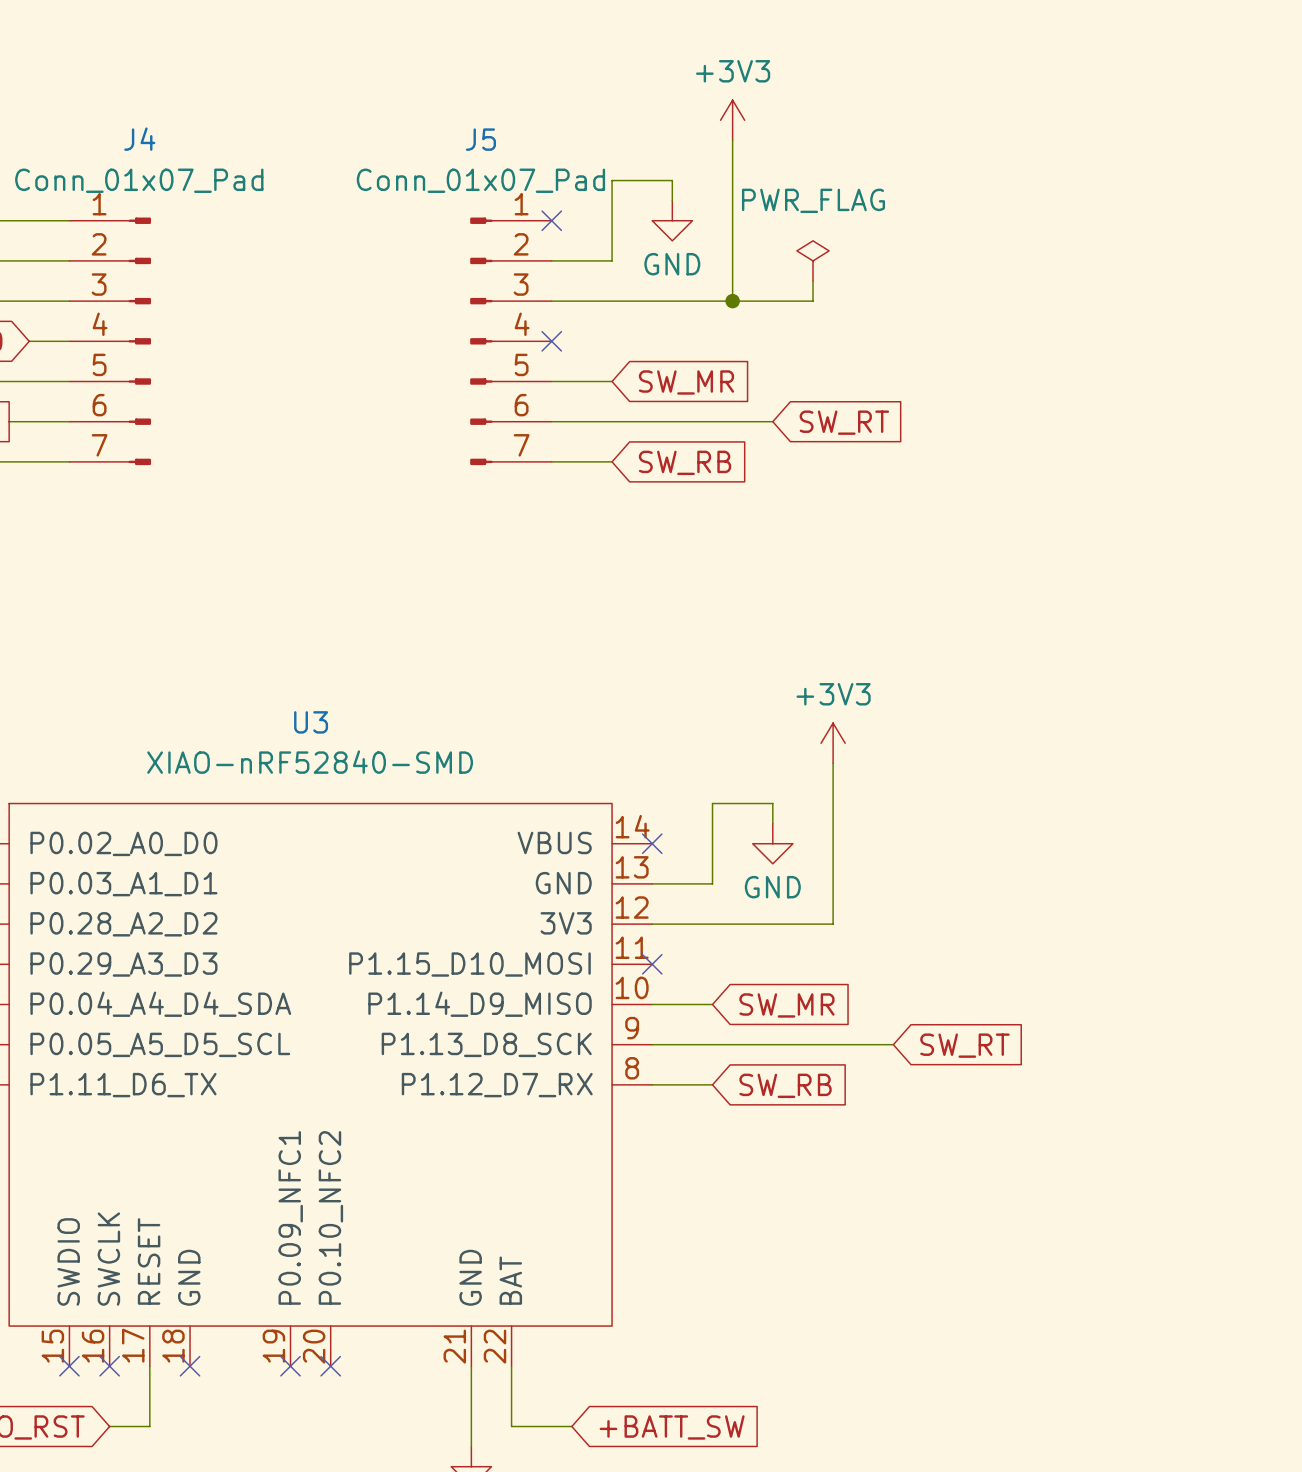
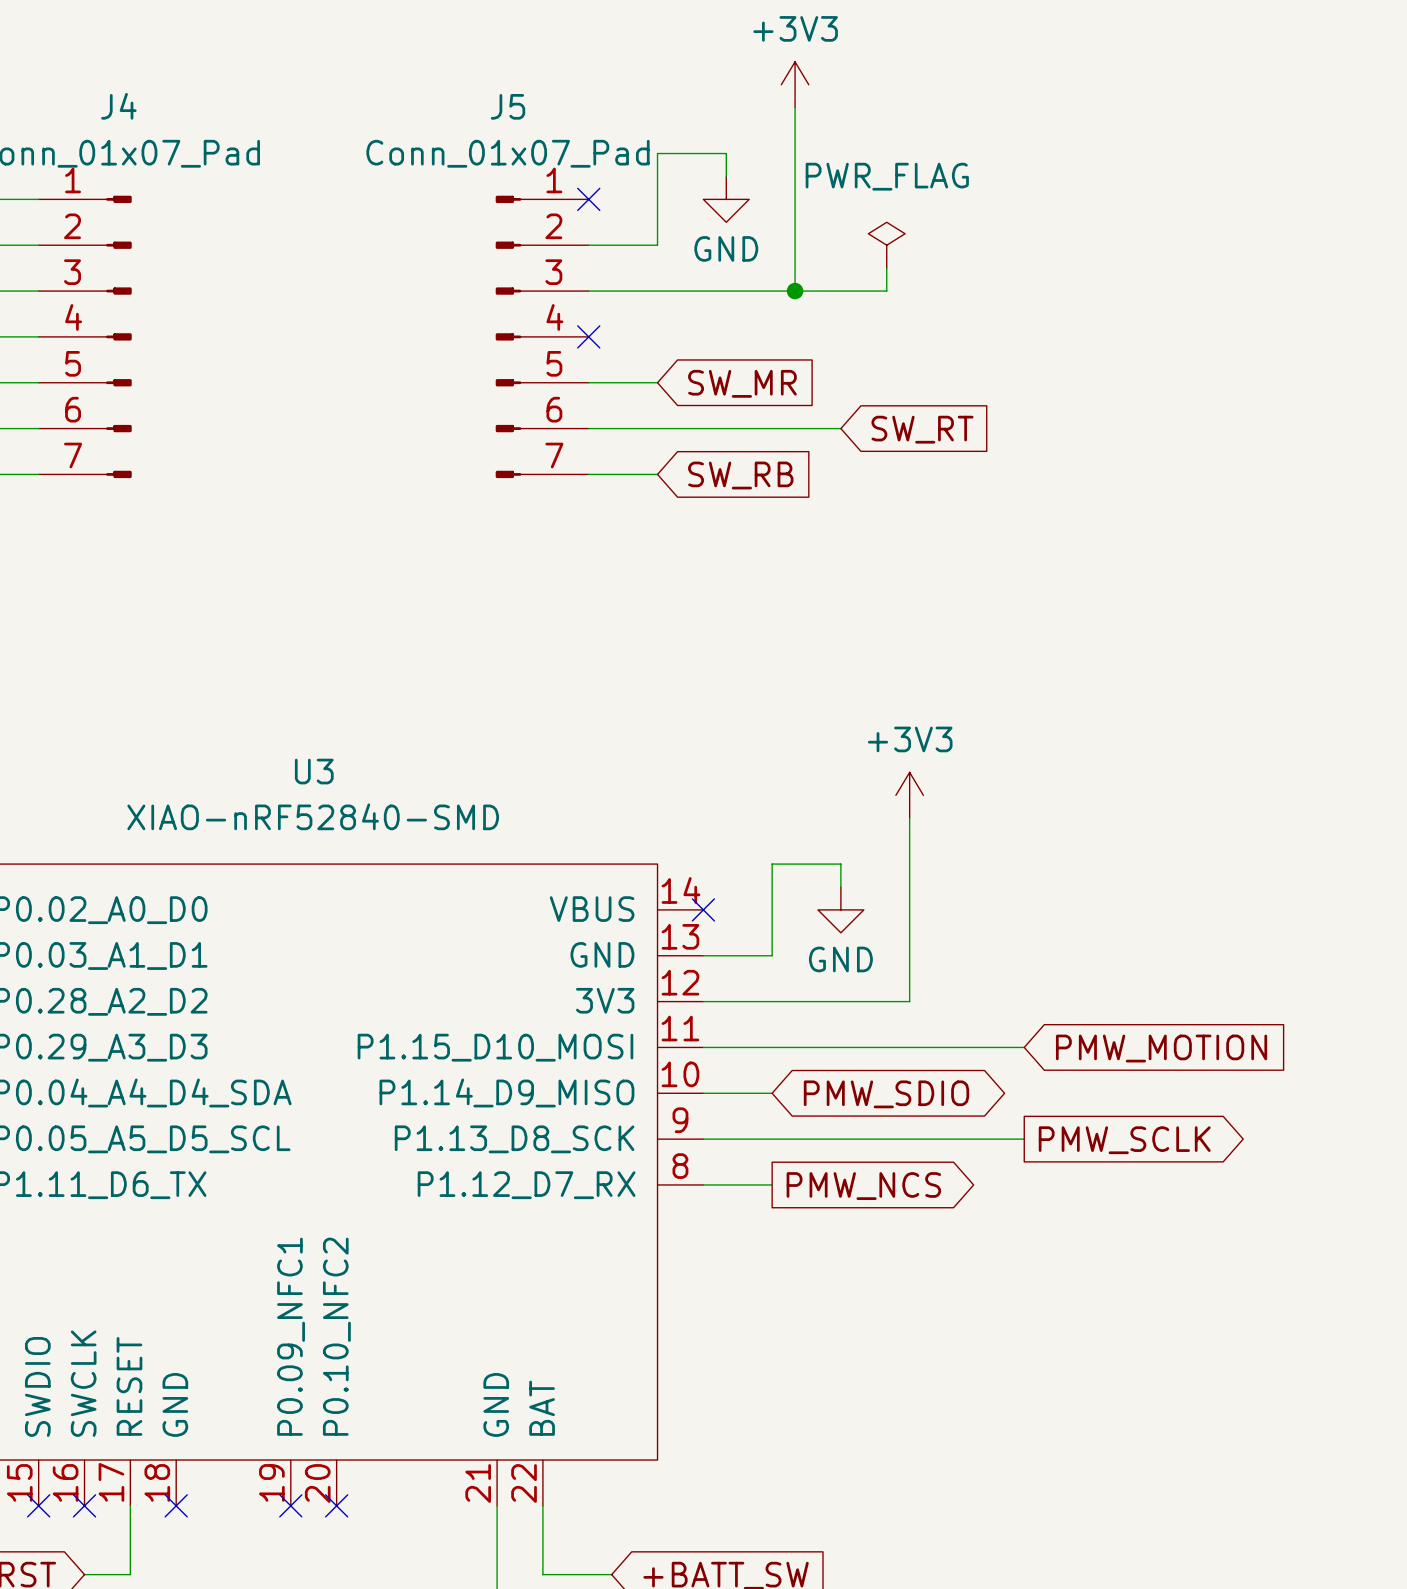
wire: none -> (703, 1047) (1024, 1047)
no-connect mark: (652, 964) -> none
global label: none -> PMW_MOTION (1161, 1048)
global label shape: input (786, 1005) -> bidirectional (886, 1094)
global label: SW_MR (786, 1005) -> PMW_SDIO (886, 1094)
wire: none -> (978, 1139) (1024, 1139)
global label: SW_RT (964, 1045) -> none
global label: none -> PMW_SCLK (1124, 1140)
global label shape: input (785, 1085) -> output (863, 1186)
global label: SW_RB (785, 1085) -> PMW_NCS (863, 1186)

